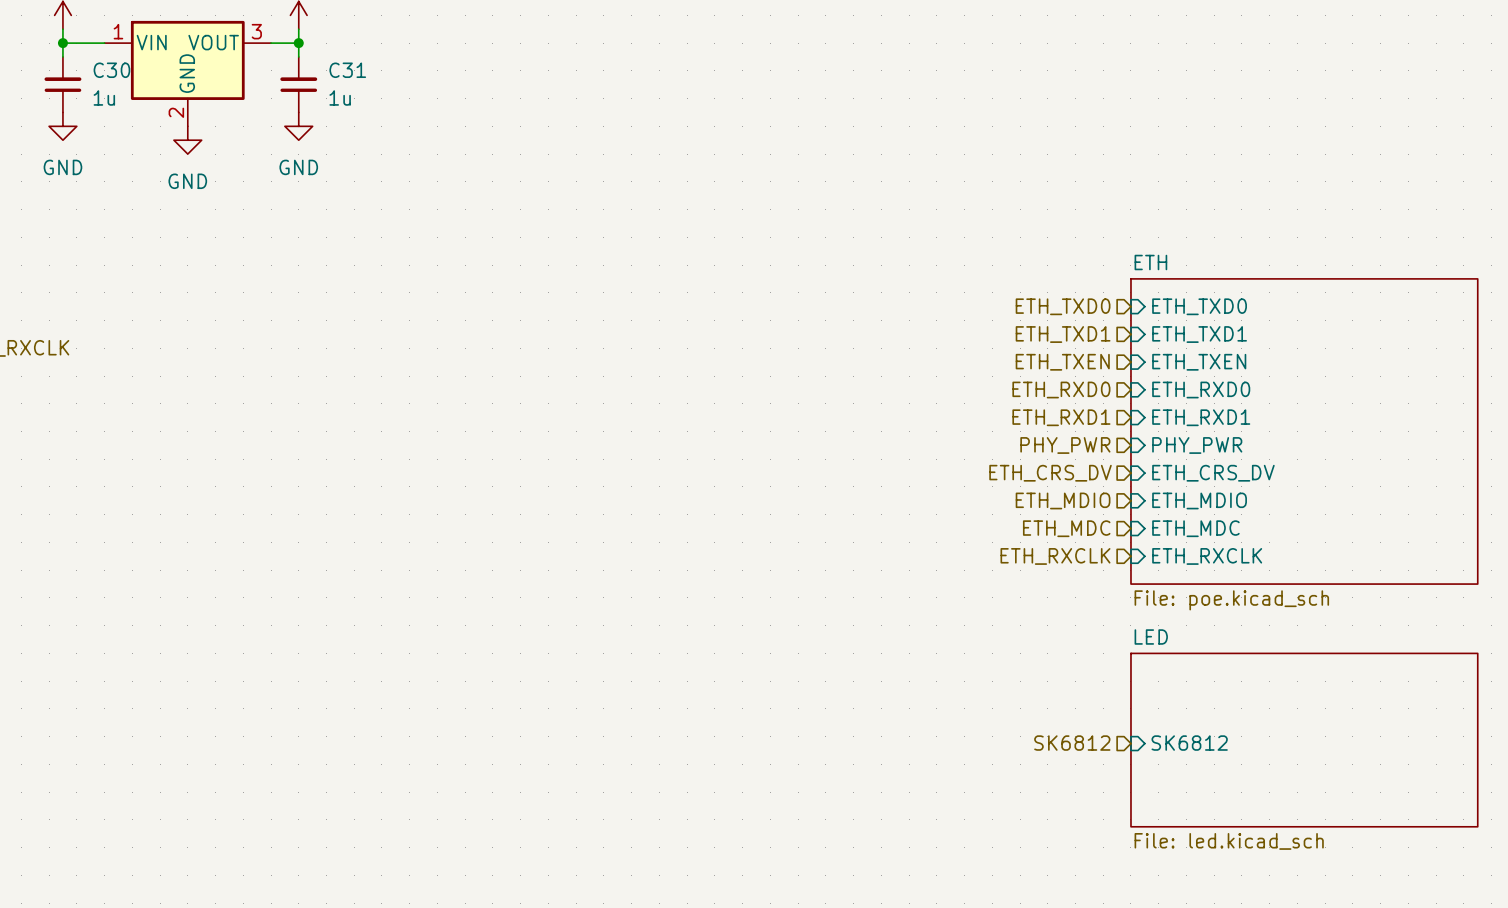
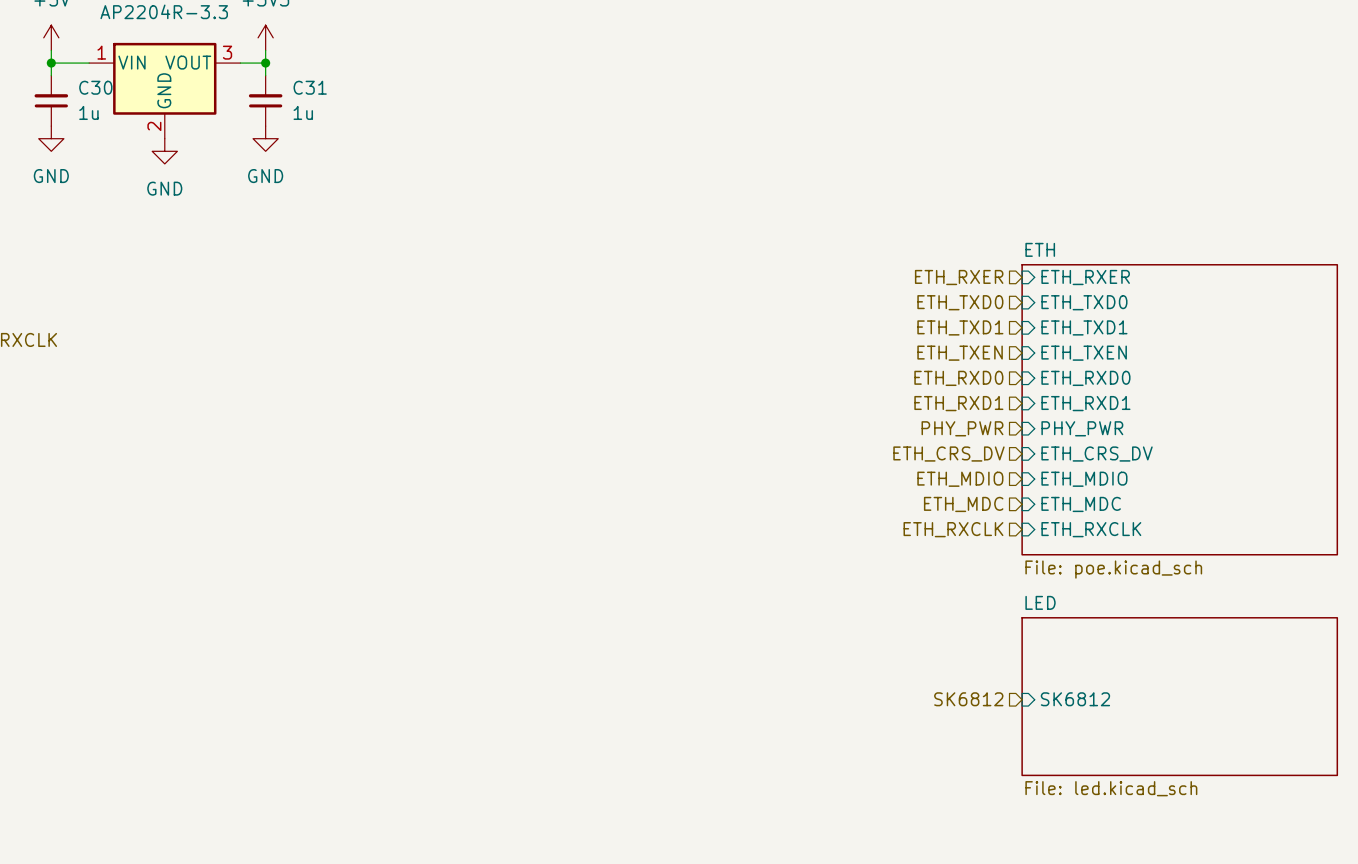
sheet ETH shape: [1130, 278, 1479, 585] -> [1021, 264, 1339, 556]
hierarchical label: none -> ETH_RXER (959, 277)
sheet pin: none -> ETH_RXER (1085, 277)

